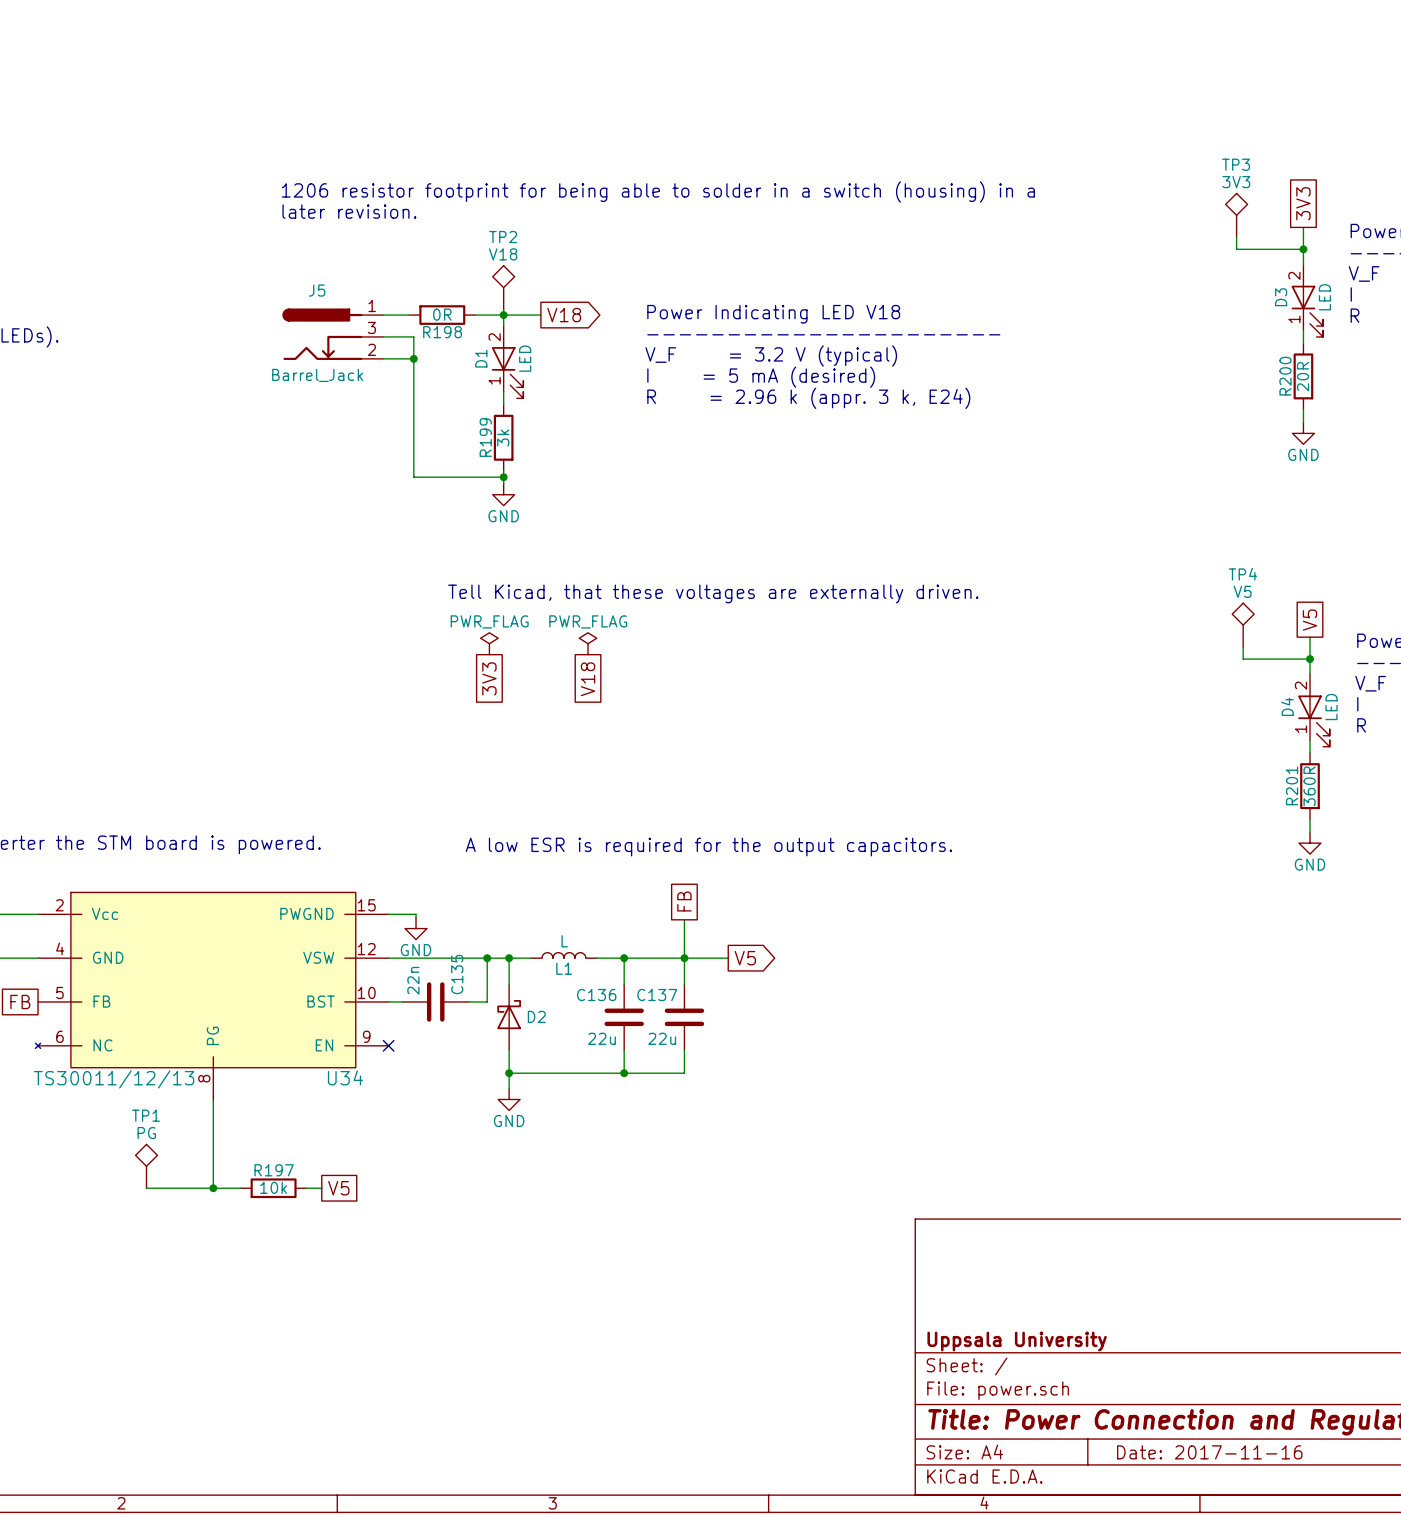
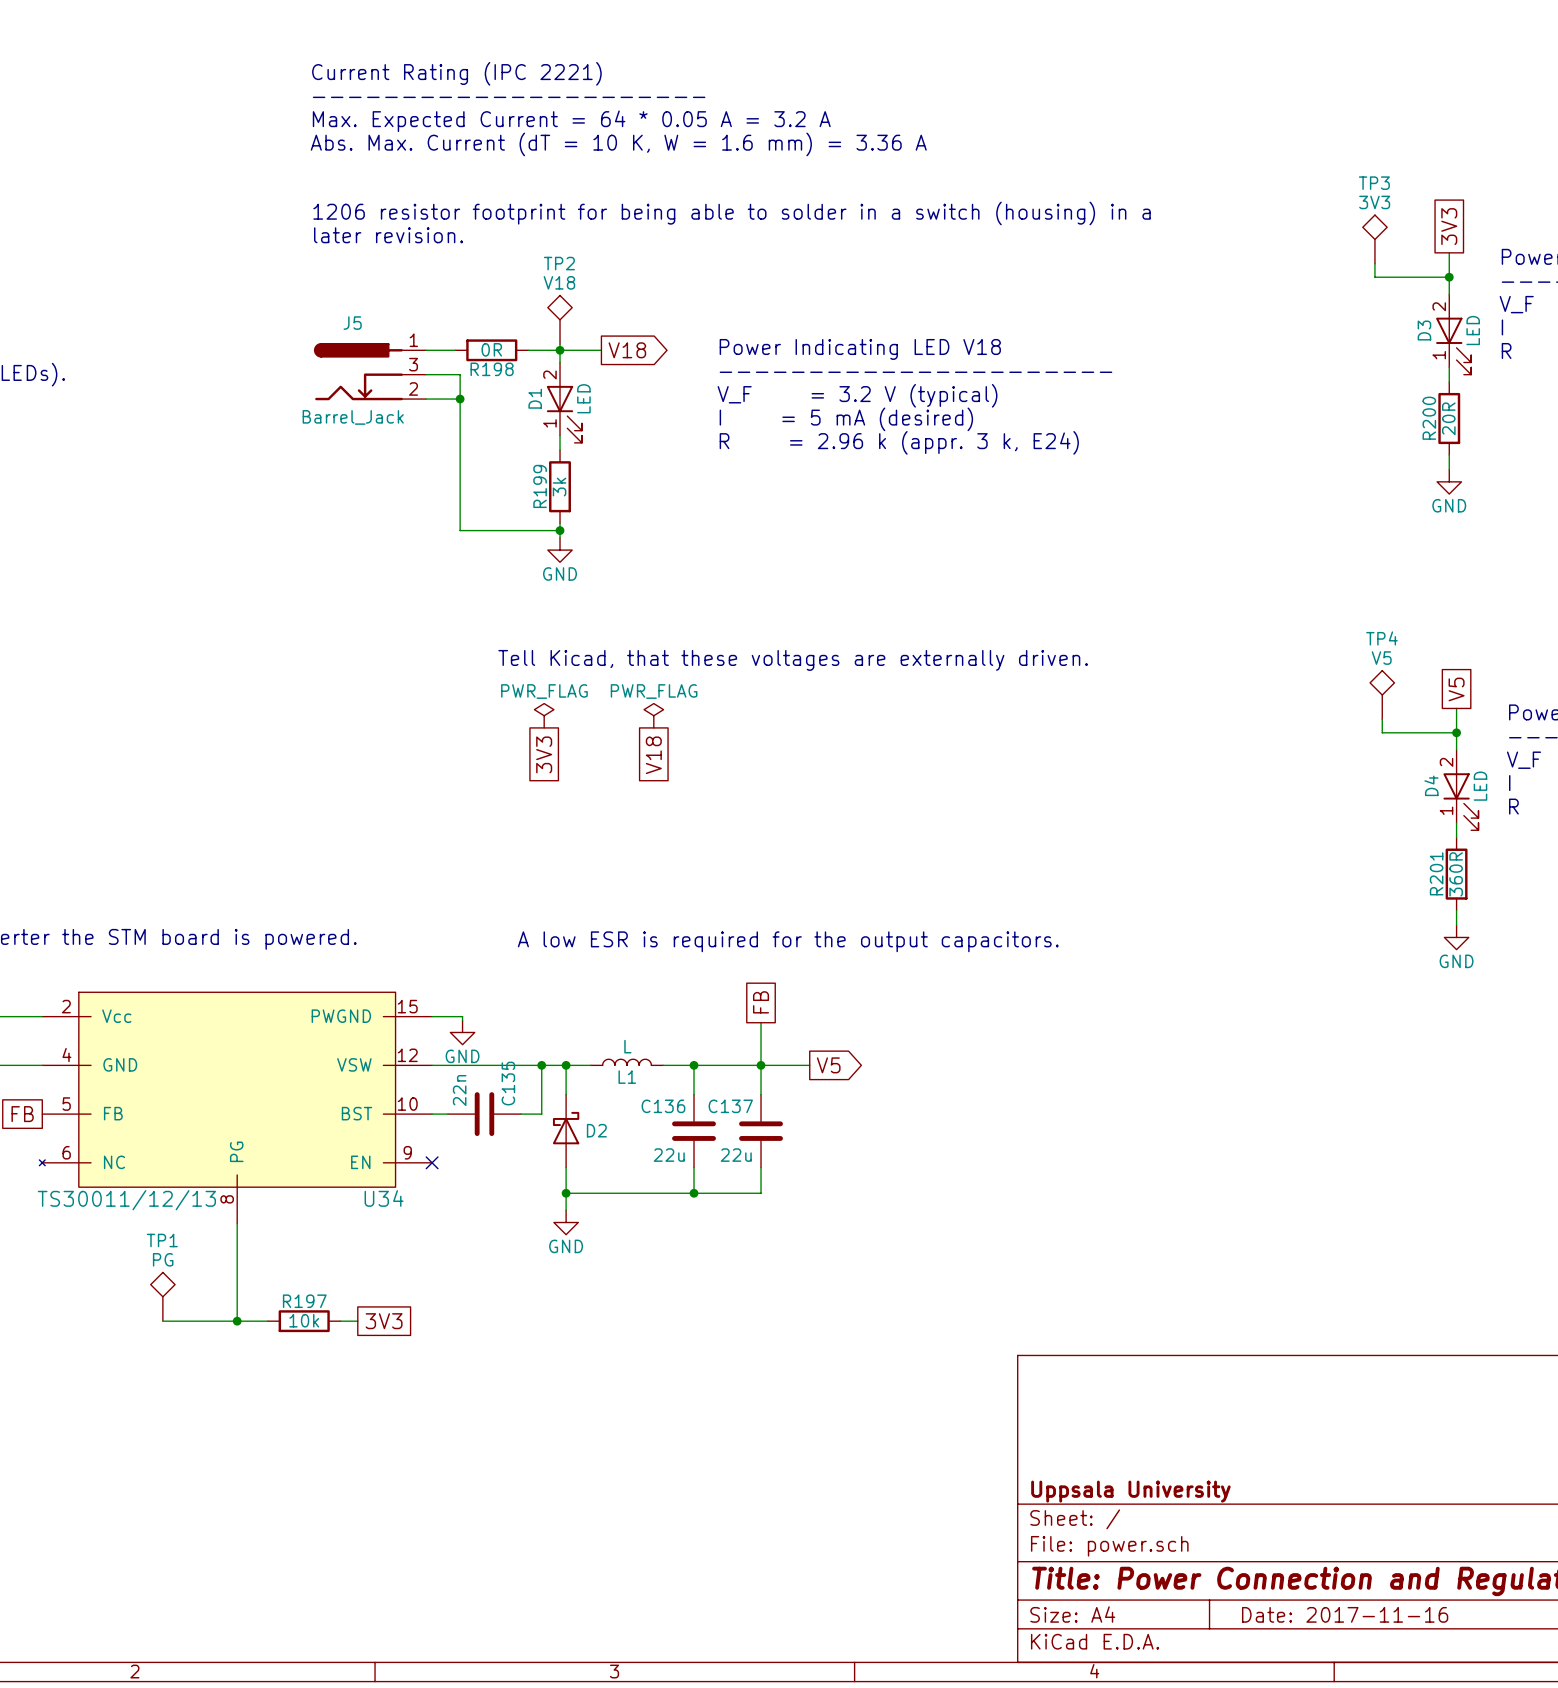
text: none -> Current Rating (IPC 2221) (456, 73)
text: none -> ---------------------- (509, 97)
text: none -> Max. Expected Current = 64 * 0.05 A = 3.2 A (571, 121)
text: none -> Abs. Max. Current (dT = 10 K, W = 1.6 mm) = 3.36 A (618, 144)
global label: V5 (338, 1188) -> 3V3 (384, 1321)

